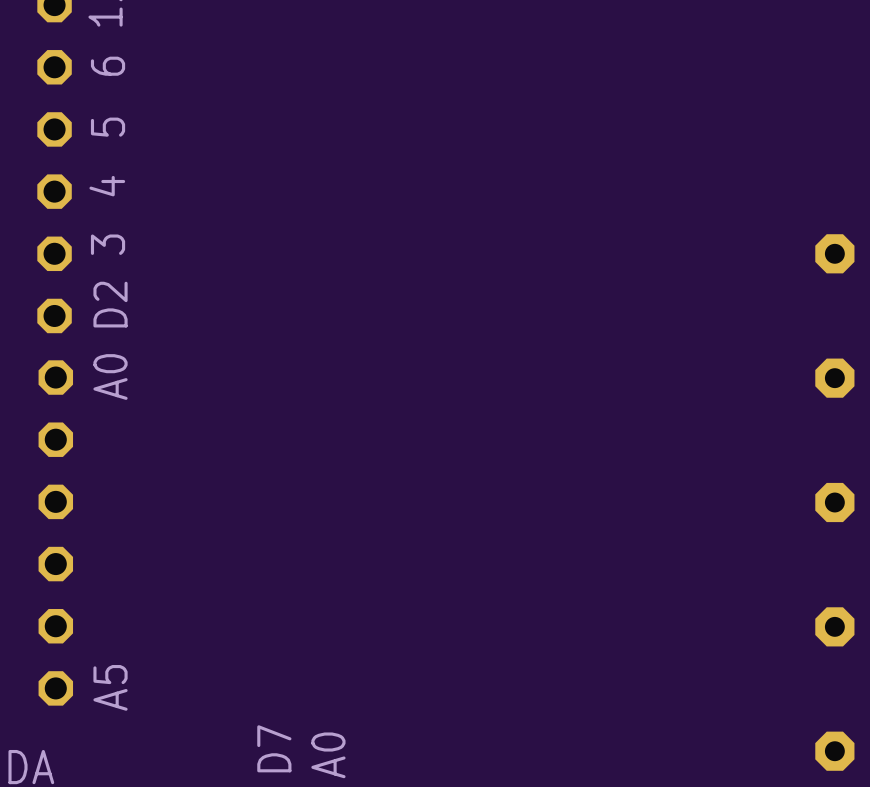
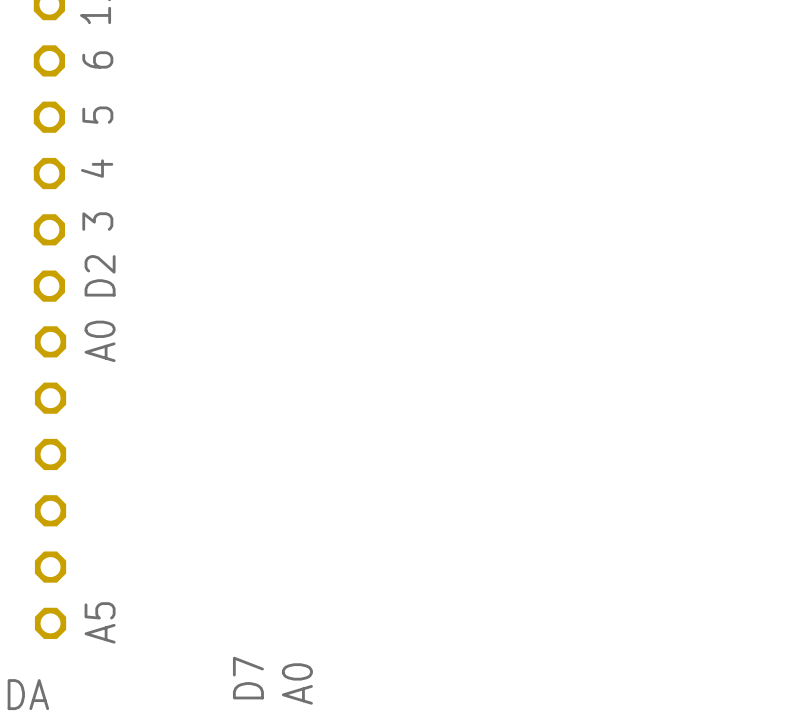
part: (834, 253) -> none
part: (834, 378) -> none
part: (834, 502) -> none
part: (834, 626) -> none
part: (834, 751) -> none

